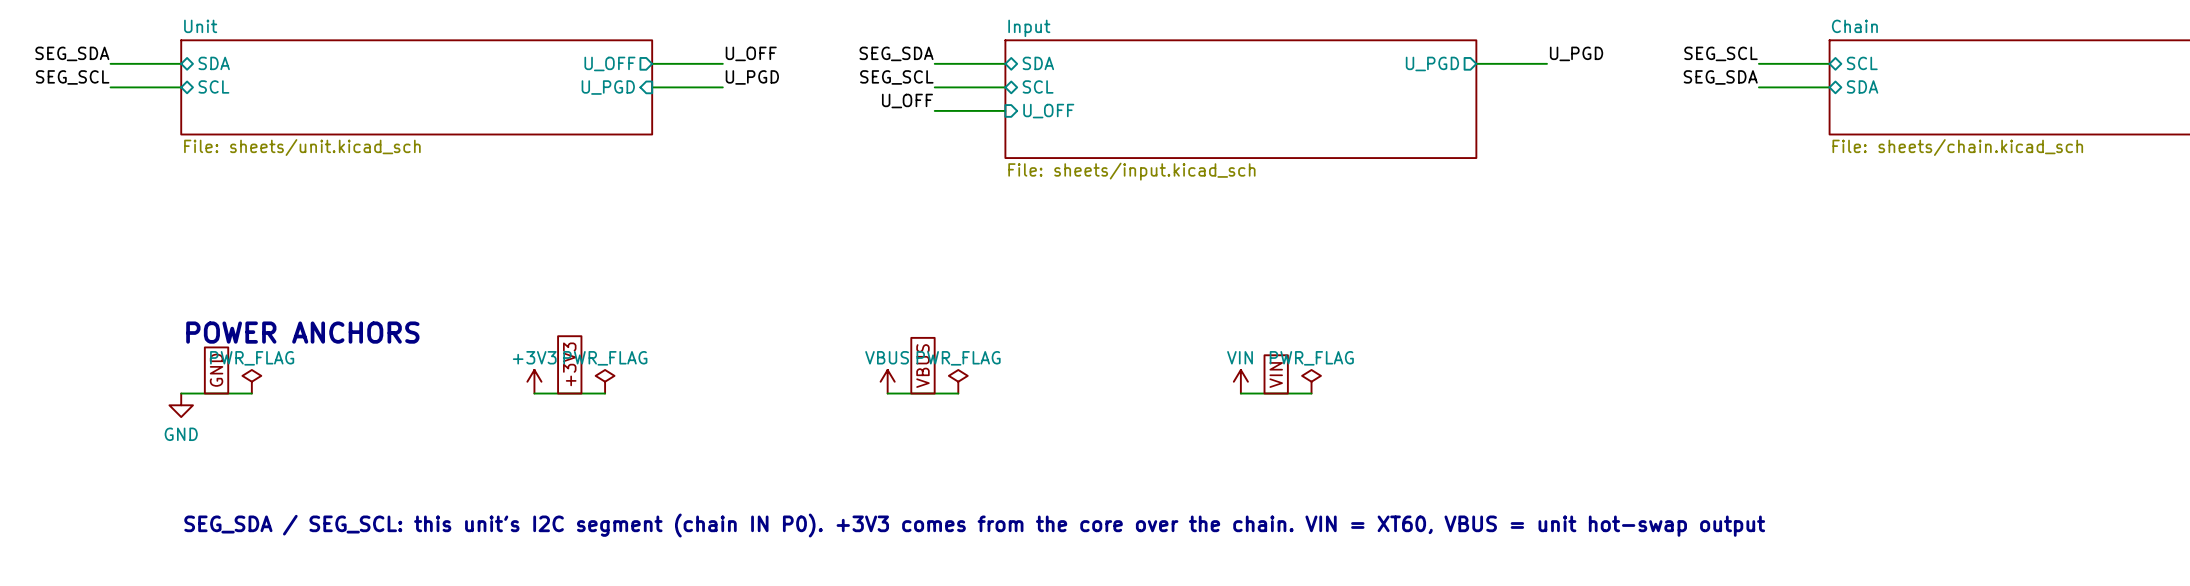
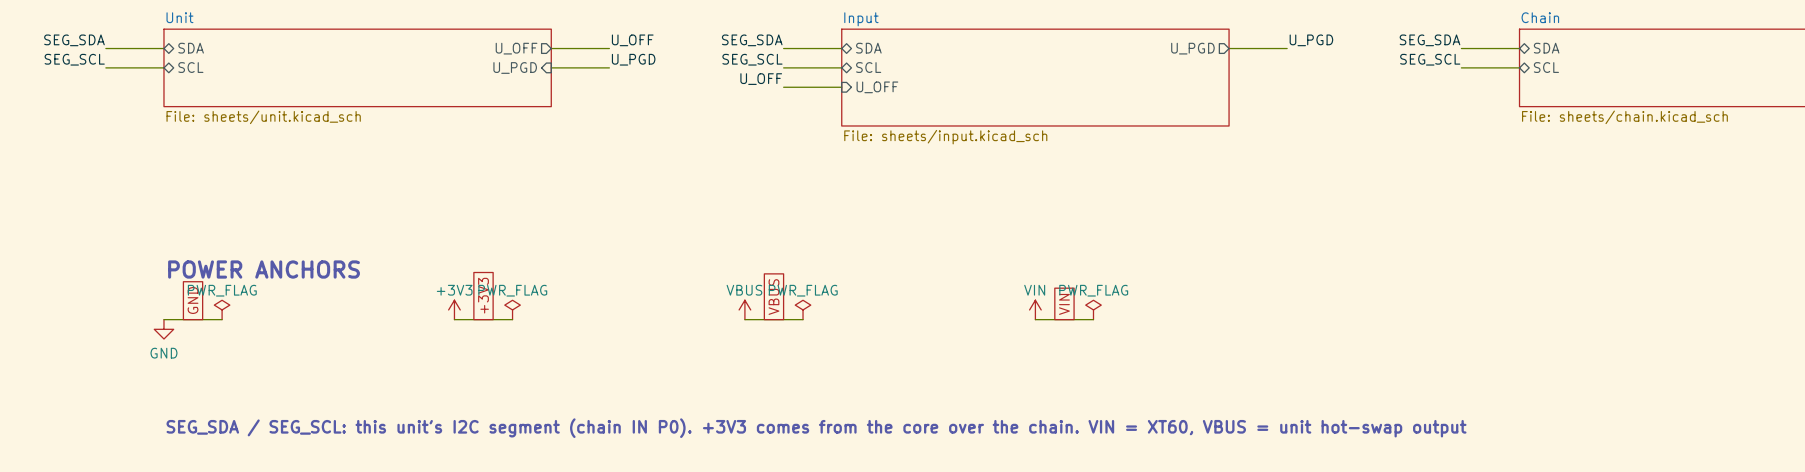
label: SEG_SCL (1721, 53) -> SEG_SDA (1429, 40)
sheet pin: SCL (1862, 63) -> SDA (1546, 48)
label: SEG_SDA (1720, 77) -> SEG_SCL (1430, 59)
sheet pin: SDA (1862, 86) -> SCL (1546, 67)

